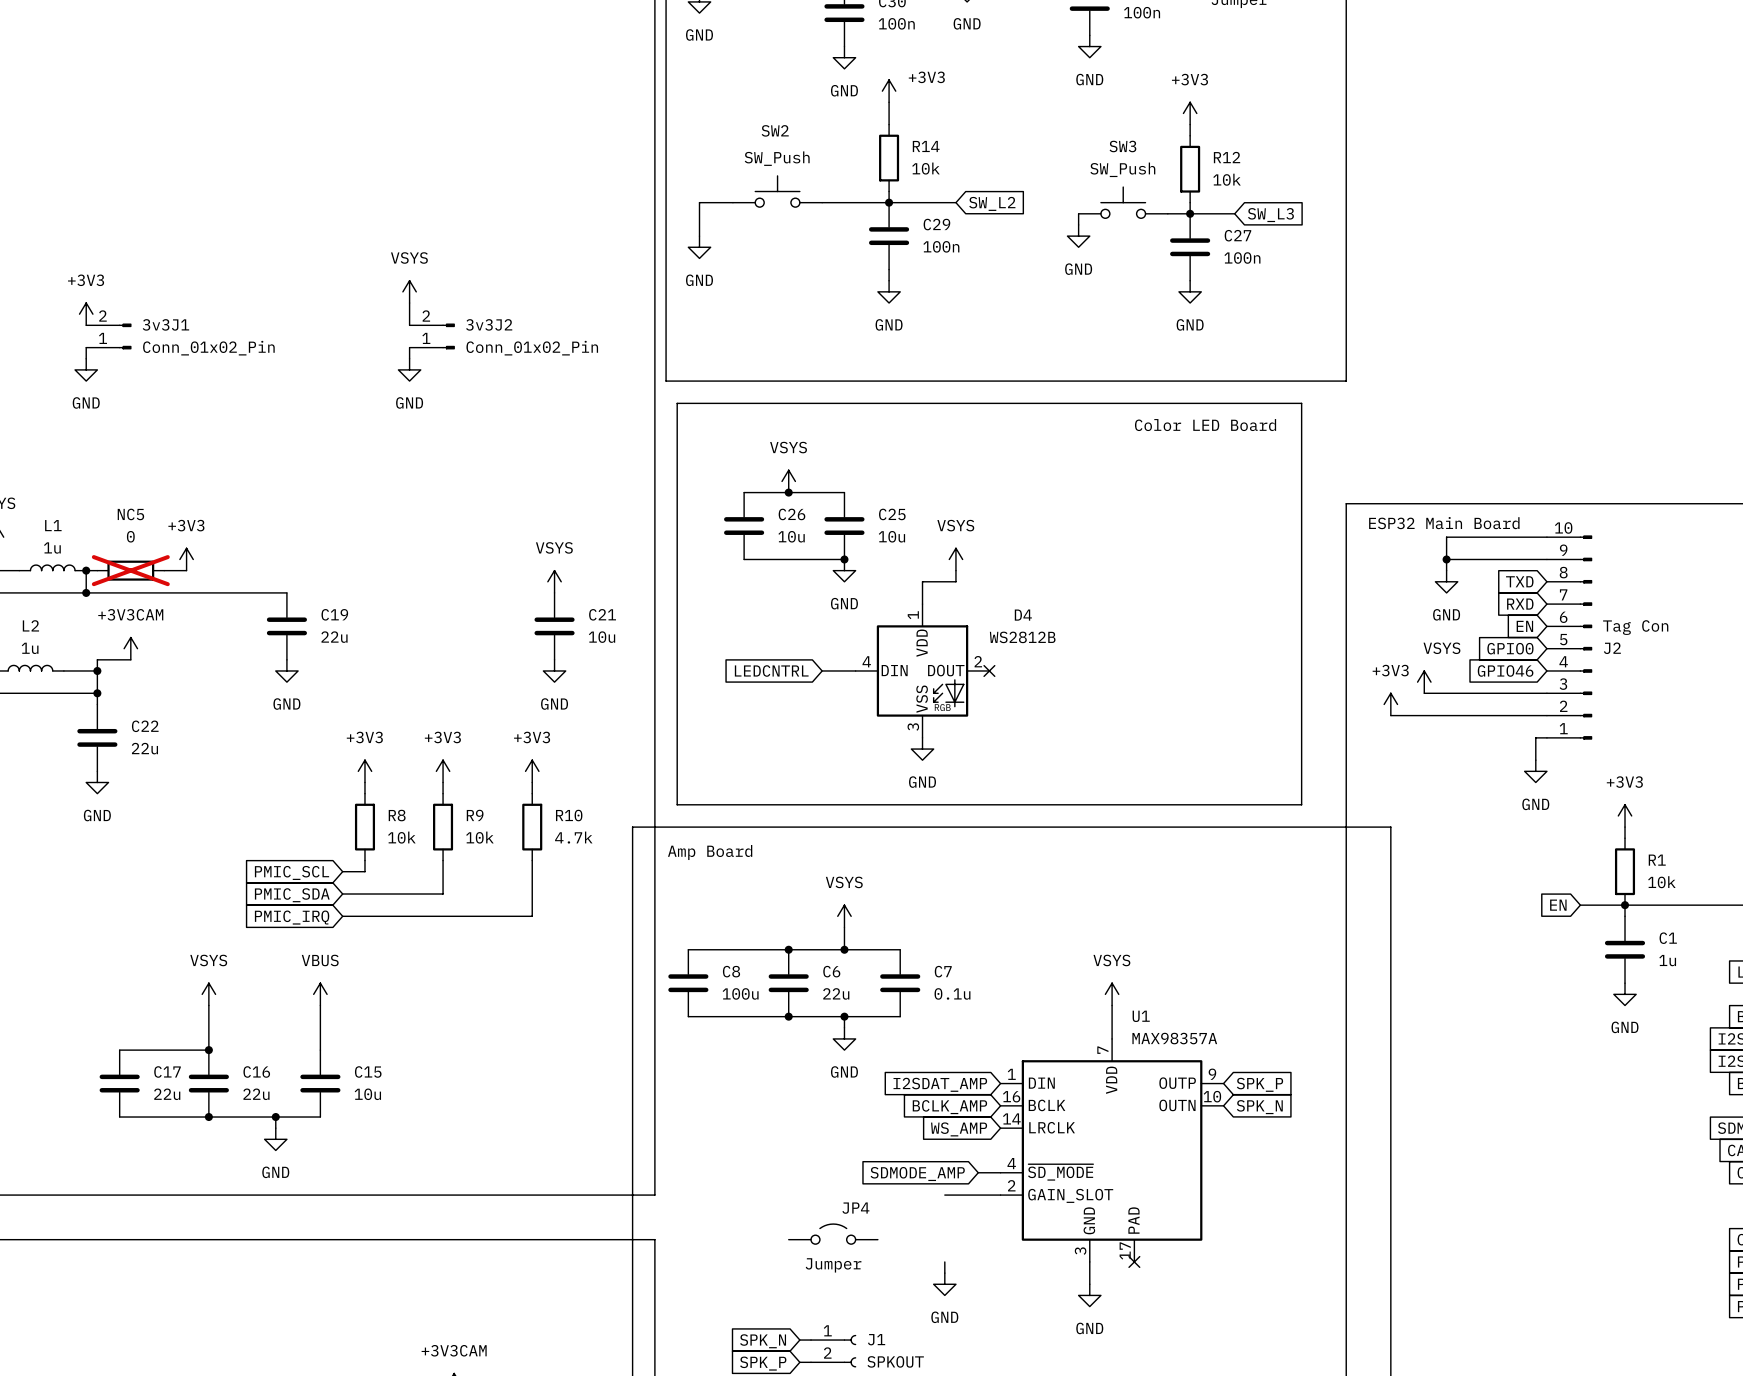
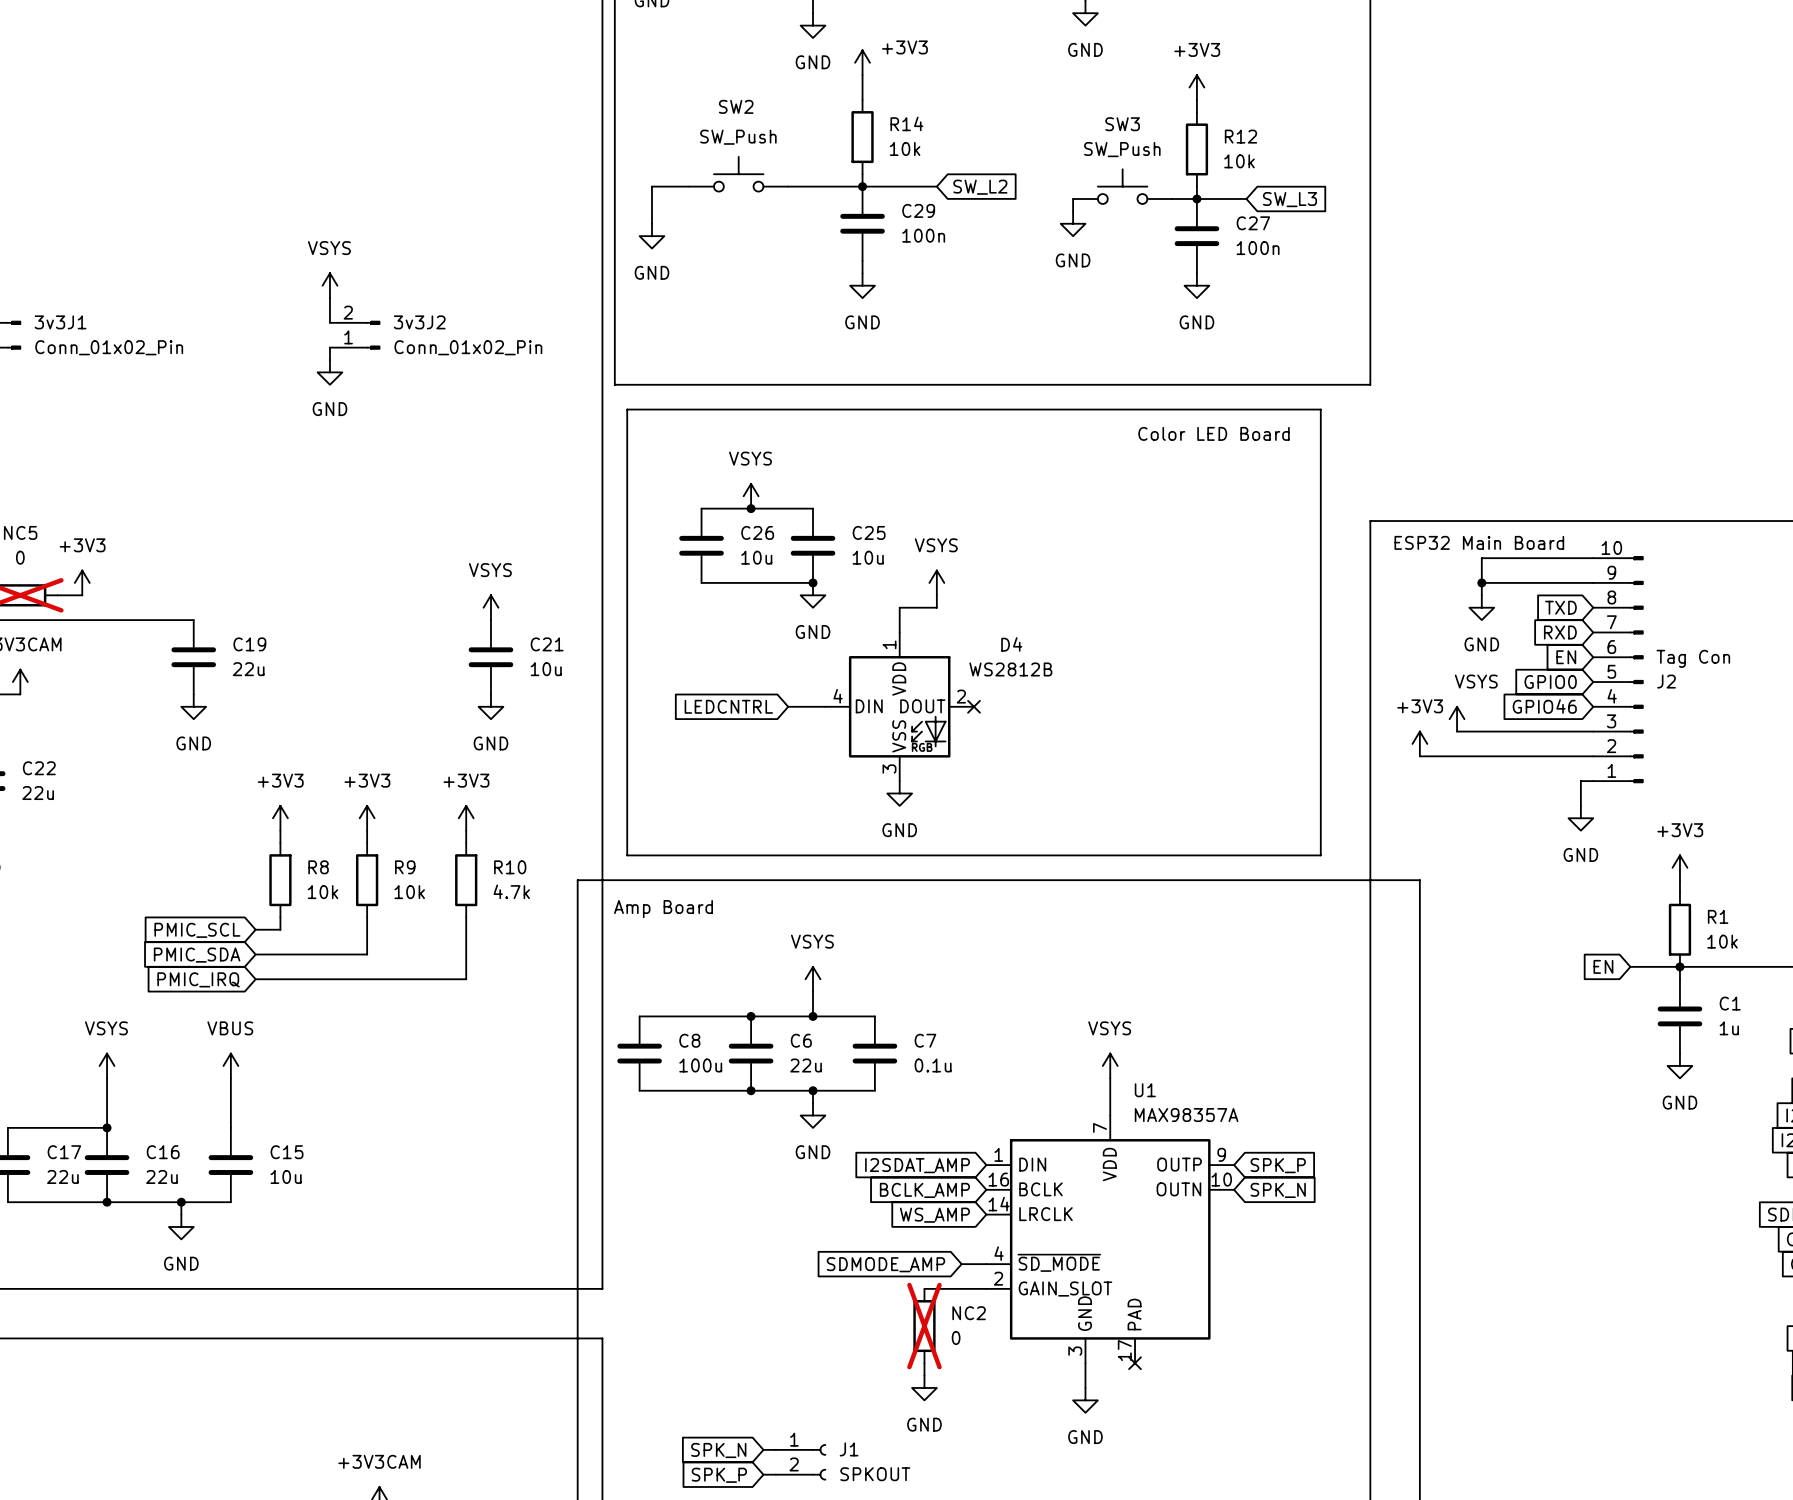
NC2: none -> 0 (924, 1326)
JP4: Jumper (833, 1234) -> none

